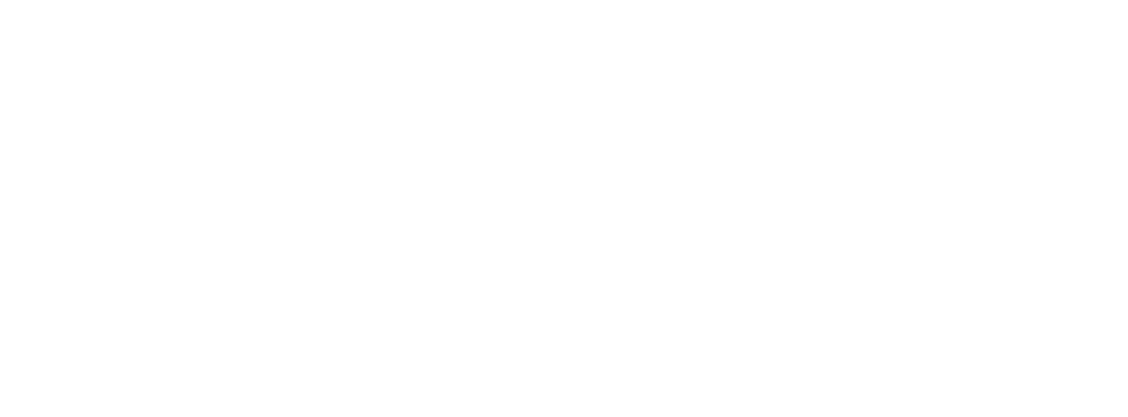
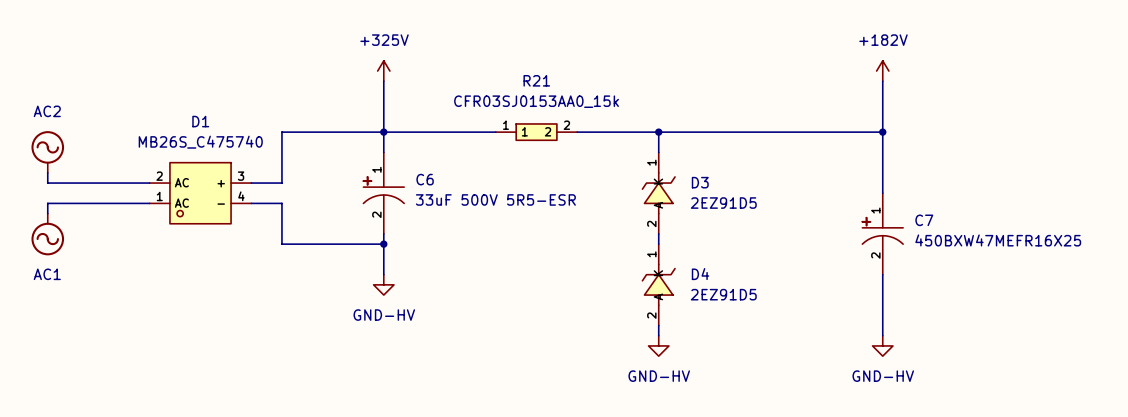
power symbol: none -> +325V (383, 71)
power symbol: none -> +182V (882, 71)
wire: none -> (383, 81) (383, 152)
wire: none -> (882, 81) (882, 193)
junction: none -> (383, 132)
wire: none -> (495, 132) (281, 132) (281, 183) (251, 183)
R21: none -> CFR03SJ0153AA0_15k (536, 132)
wire: none -> (577, 132) (882, 132)
wire: none -> (658, 132) (658, 152)
junction: none -> (658, 132)
junction: none -> (882, 132)
power symbol: none -> AC2 (47, 151)
wire: none -> (47, 172) (47, 183) (149, 183)
D1: none -> MB26S_C475740 (200, 193)
C6: none -> 33uF 500V 5R5-ESR (383, 193)
D3: none -> 2EZ91D5 (658, 193)
wire: none -> (149, 203) (47, 203) (47, 213)
wire: none -> (251, 203) (281, 203) (281, 244) (383, 244)
wire: none -> (383, 233) (383, 274)
wire: none -> (658, 233) (658, 244)
C7: none -> 450BXW47MEFR16X25 (882, 233)
power symbol: none -> AC1 (47, 234)
junction: none -> (383, 244)
wire: none -> (882, 274) (882, 335)
power symbol: none -> GND-HV (383, 284)
D4: none -> 2EZ91D5 (658, 284)
wire: none -> (658, 325) (658, 335)
power symbol: none -> GND-HV (658, 345)
power symbol: none -> GND-HV (882, 345)

